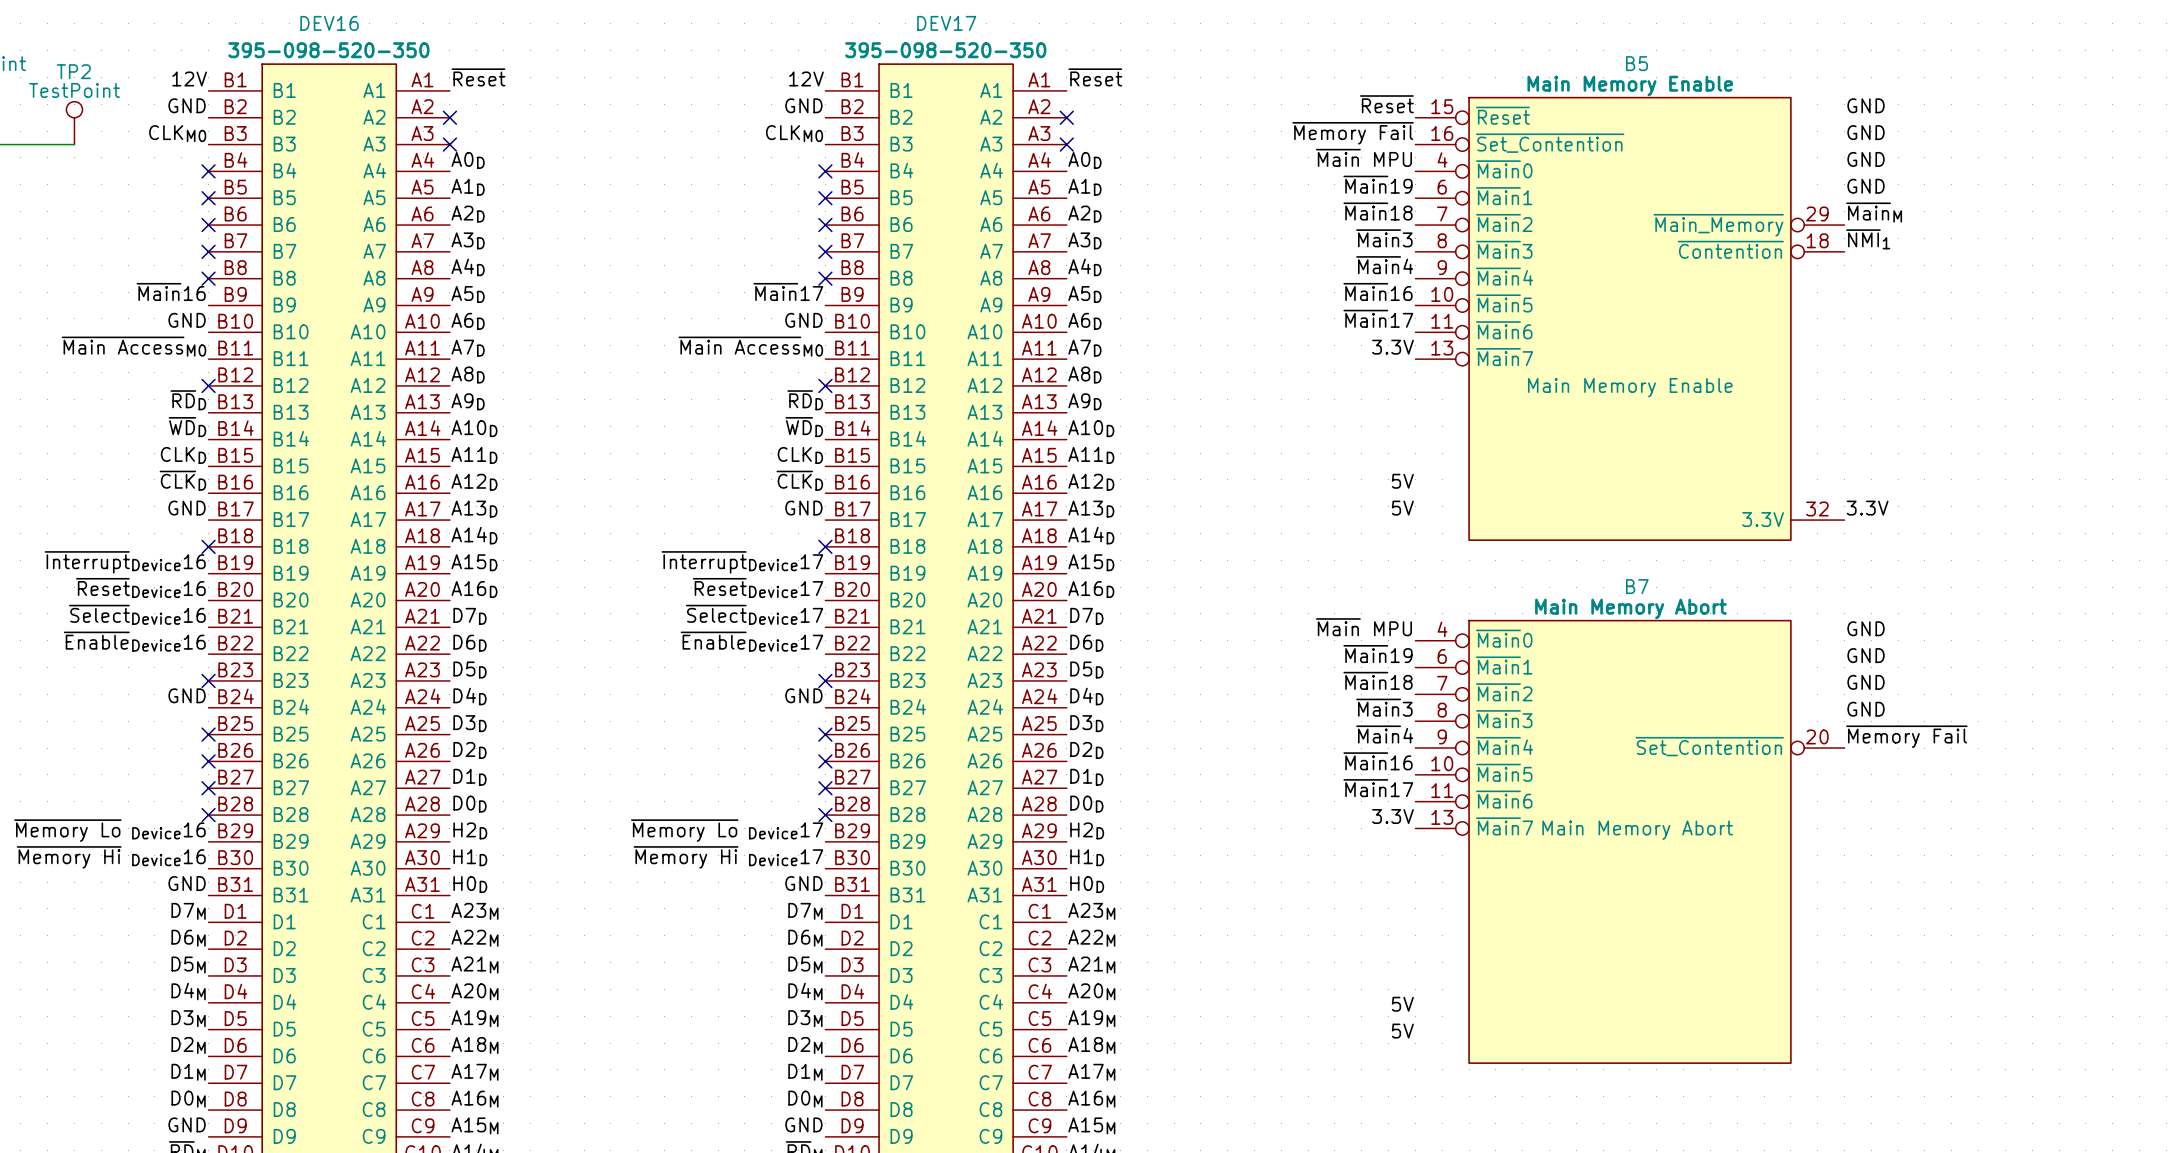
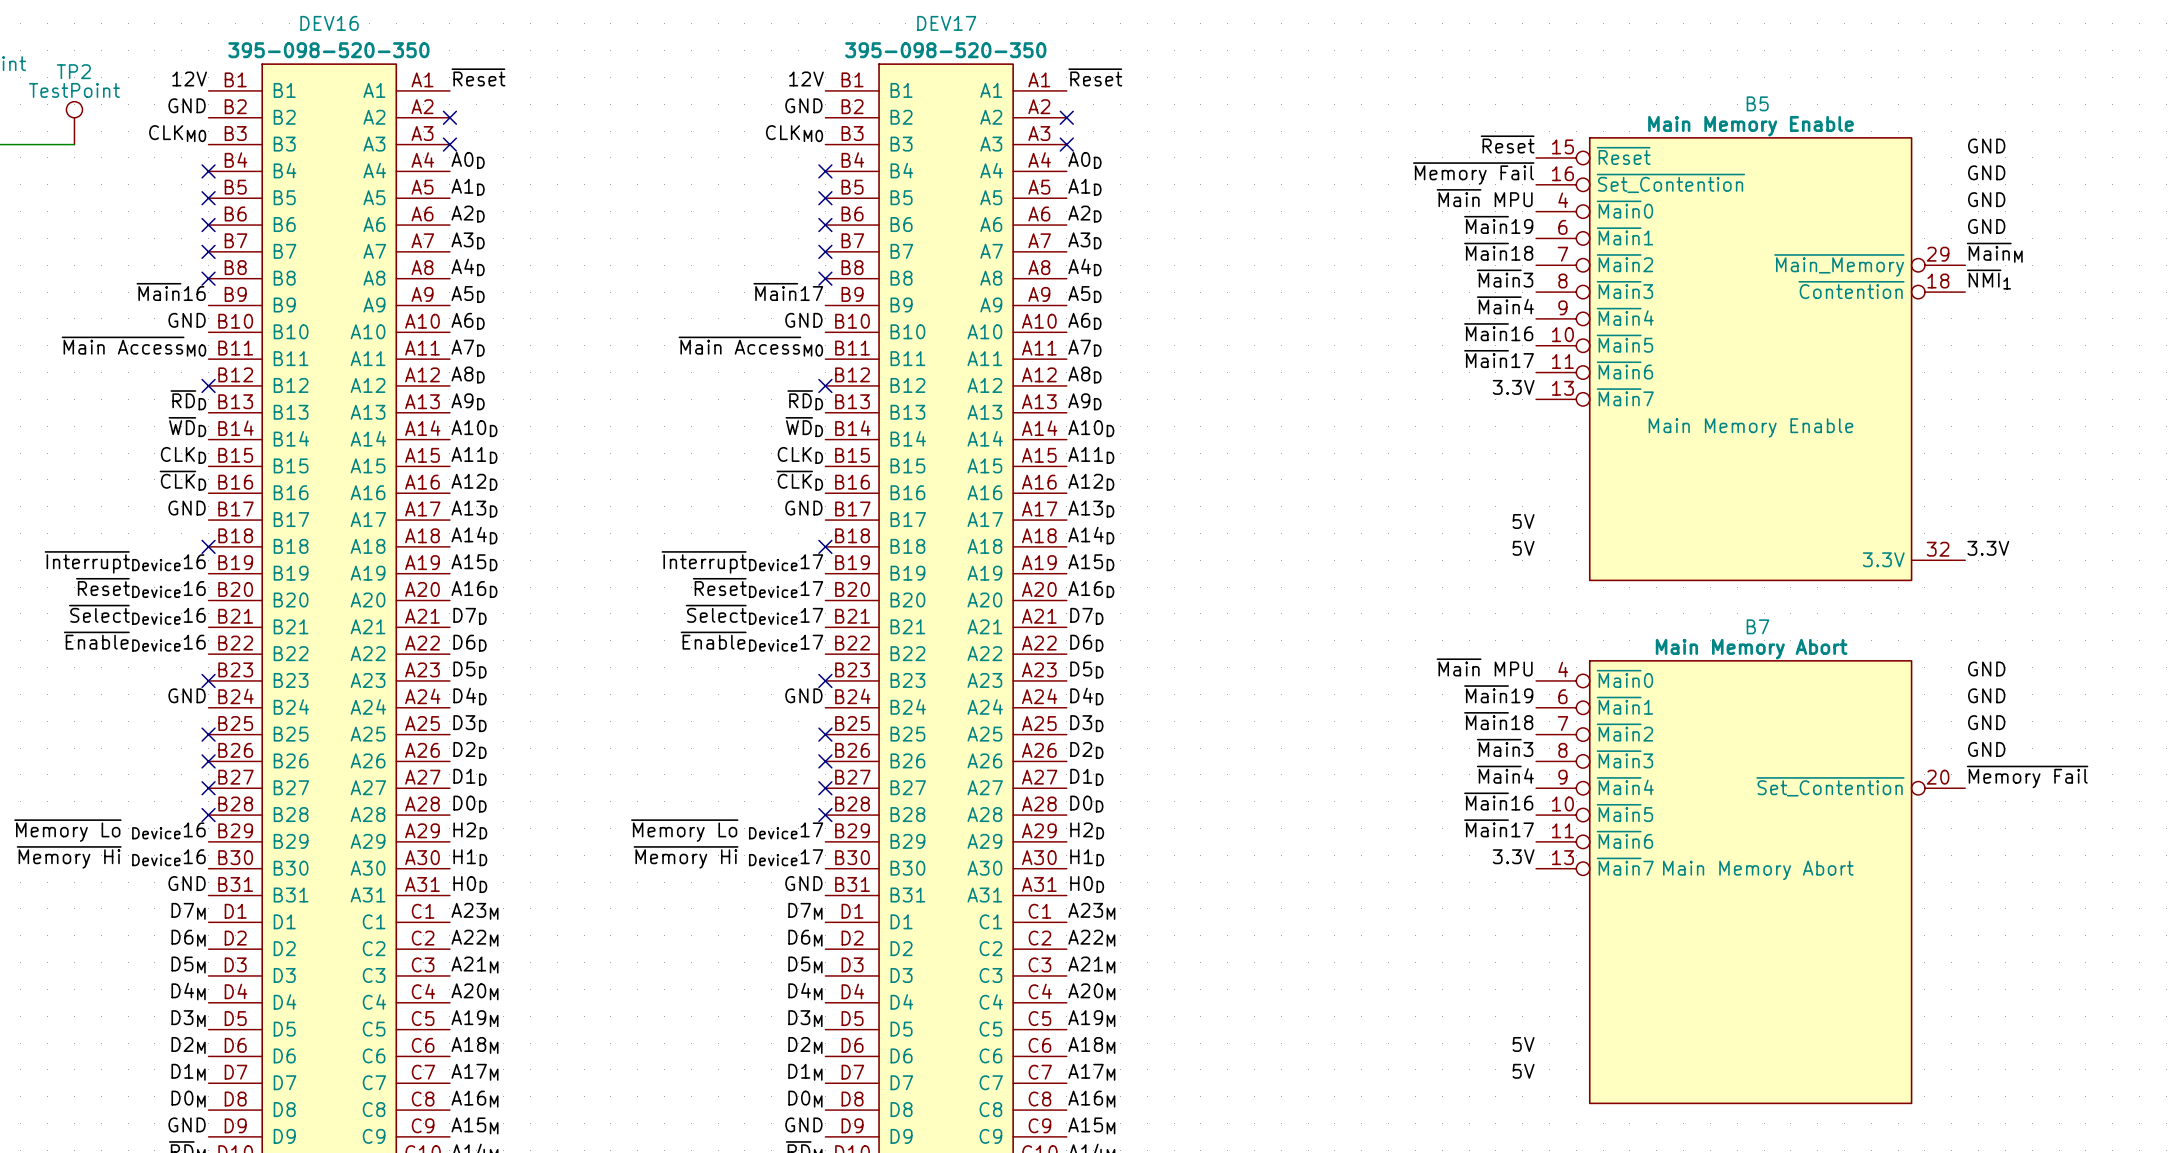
label position: ~{Reset} (1386, 104) -> ~{Reset} (1507, 144)
label: GND (1866, 105) -> none
label: GND (1866, 132) -> none
label position: ~{Memory Fail} (1353, 133) -> ~{Memory Fail} (1473, 173)
label: none -> GND (1986, 146)
label position: ~{Main} MPU (1363, 157) -> ~{Main} MPU (1484, 198)
label: GND (1866, 159) -> none
label: none -> GND (1986, 172)
label position: ~{Main}19 (1378, 184) -> ~{Main}19 (1498, 224)
label: GND (1866, 186) -> none
label: none -> GND (1986, 199)
label position: ~{Main}18 (1378, 211) -> ~{Main}18 (1498, 251)
label position: ~{Main}M (1874, 212) -> ~{Main}M (1994, 252)
label: none -> GND (1986, 226)
label position: ~{Main}3 (1384, 238) -> ~{Main}3 (1505, 278)
label position: ~{NMI}1 (1868, 239) -> ~{NMI}1 (1988, 279)
label position: ~{Main}4 (1384, 265) -> ~{Main}4 (1505, 305)
label position: ~{Main}16 (1378, 291) -> ~{Main}16 (1498, 332)
label position: ~{Main}17 (1378, 318) -> ~{Main}17 (1499, 359)
B5 position: (1629, 318) -> (1750, 359)
label position: 3.3V (1392, 347) -> 3.3V (1513, 387)
label: 5V (1402, 481) -> none
label: 5V (1402, 508) -> none
label position: 3.3V (1867, 508) -> 3.3V (1988, 548)
label: none -> 5V (1523, 521)
label: none -> 5V (1523, 548)
label position: ~{Main} MPU (1363, 627) -> ~{Main} MPU (1484, 667)
label: GND (1866, 628) -> none
label position: ~{Main}19 (1378, 654) -> ~{Main}19 (1498, 694)
label: GND (1866, 655) -> none
label: none -> GND (1986, 669)
label position: ~{Main}18 (1378, 680) -> ~{Main}18 (1498, 721)
label: GND (1866, 682) -> none
label: none -> GND (1986, 695)
label position: ~{Main}3 (1384, 707) -> ~{Main}3 (1505, 747)
label: GND (1866, 709) -> none
label: none -> GND (1986, 722)
label position: ~{Main}4 (1384, 734) -> ~{Main}4 (1505, 774)
label position: ~{Memory Fail} (1906, 736) -> ~{Memory Fail} (2027, 776)
label: none -> GND (1986, 749)
label position: ~{Main}16 (1378, 761) -> ~{Main}16 (1498, 801)
label position: ~{Main}17 (1378, 788) -> ~{Main}17 (1499, 828)
label position: 3.3V (1392, 816) -> 3.3V (1513, 856)
B7 position: (1629, 841) -> (1750, 882)
label: 5V (1402, 1004) -> none
label: 5V (1402, 1031) -> none
label: none -> 5V (1523, 1044)
label: none -> 5V (1523, 1071)

